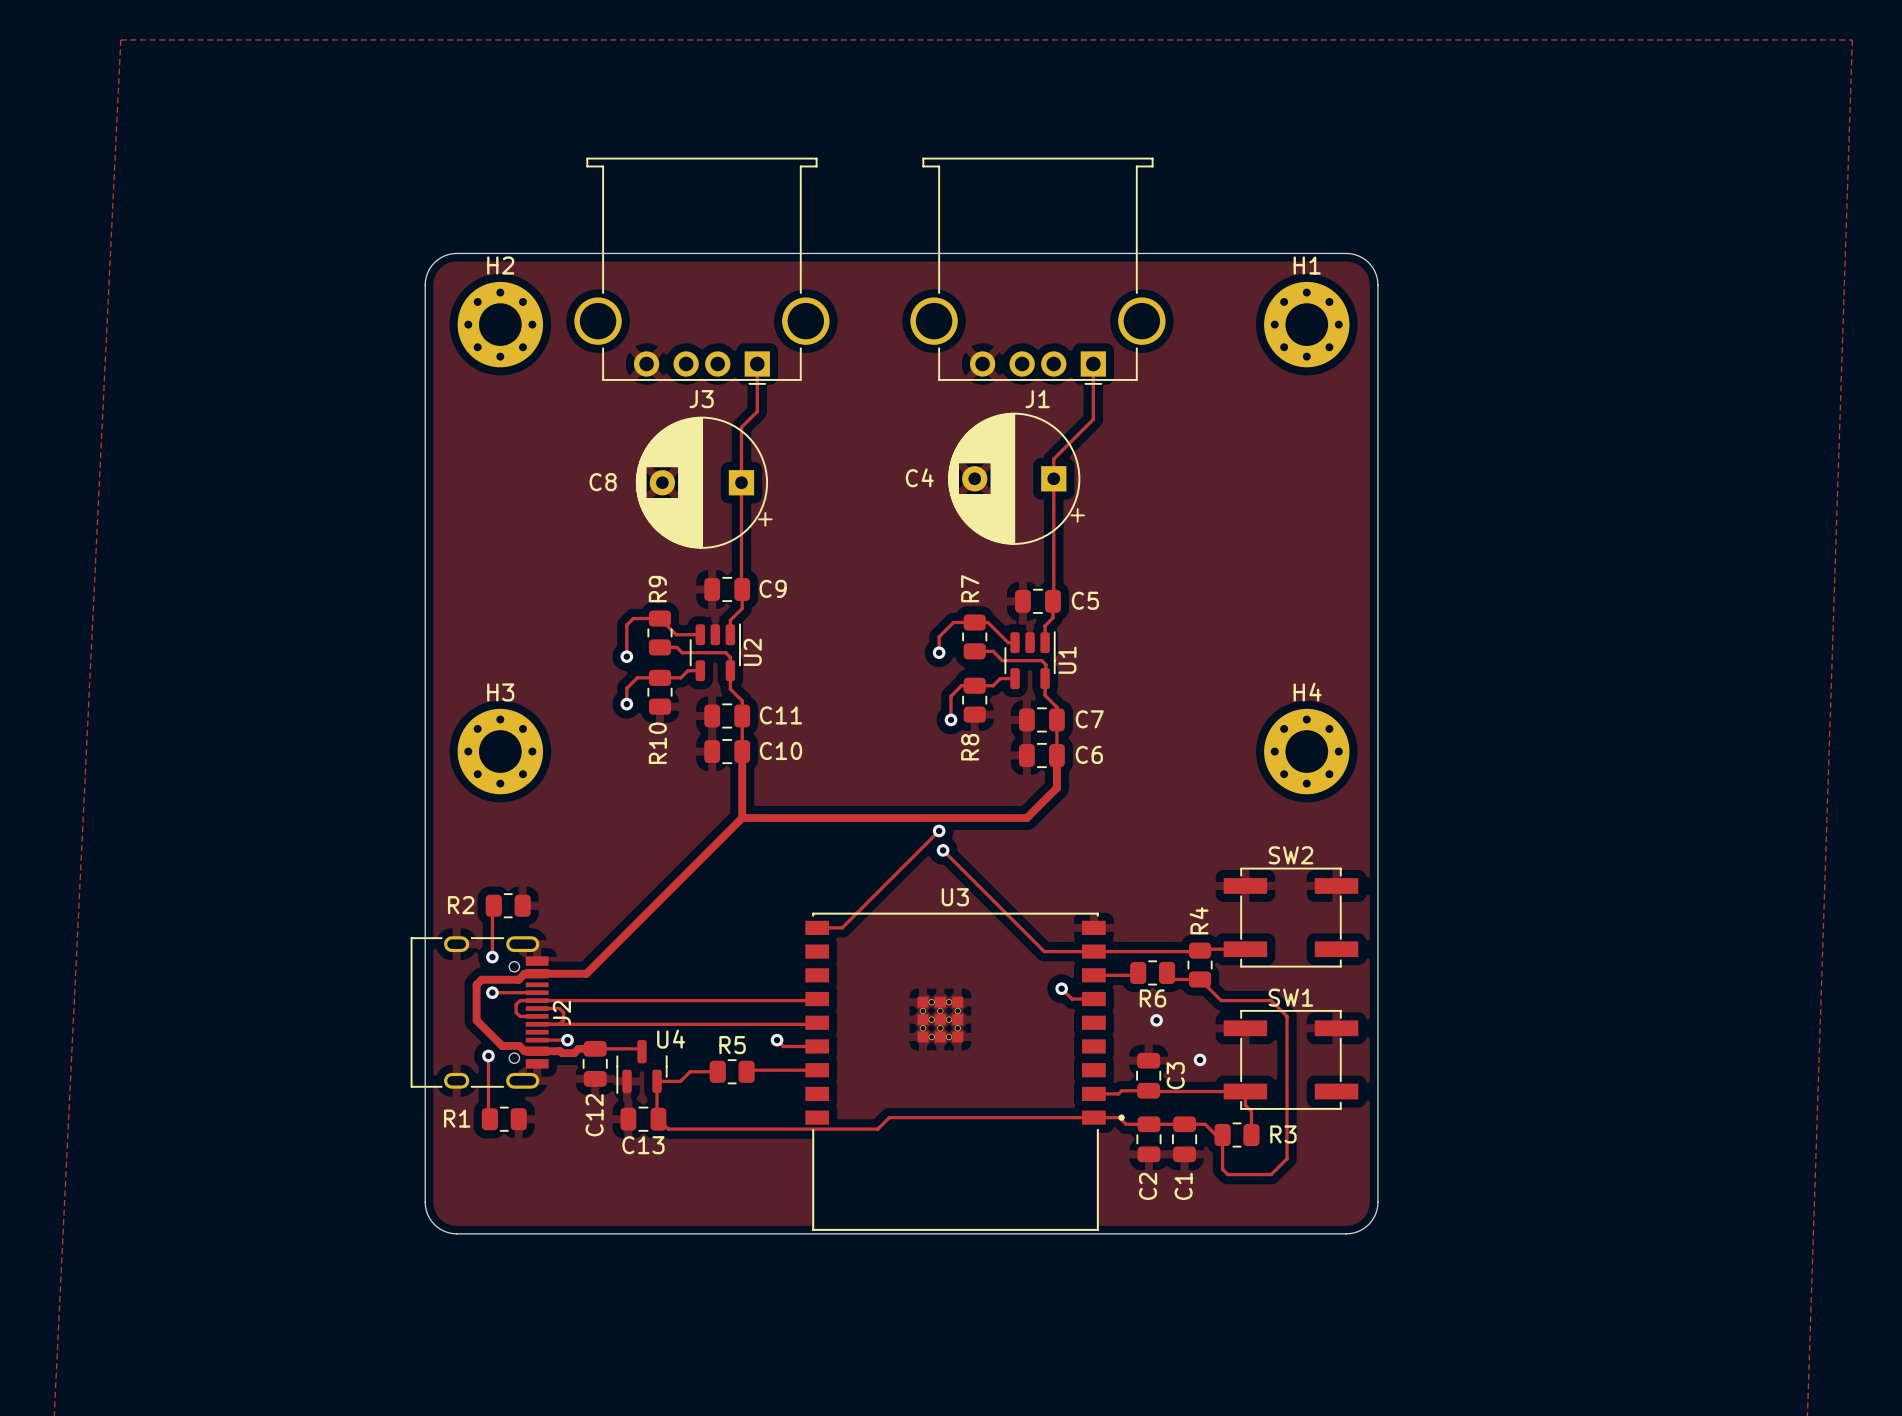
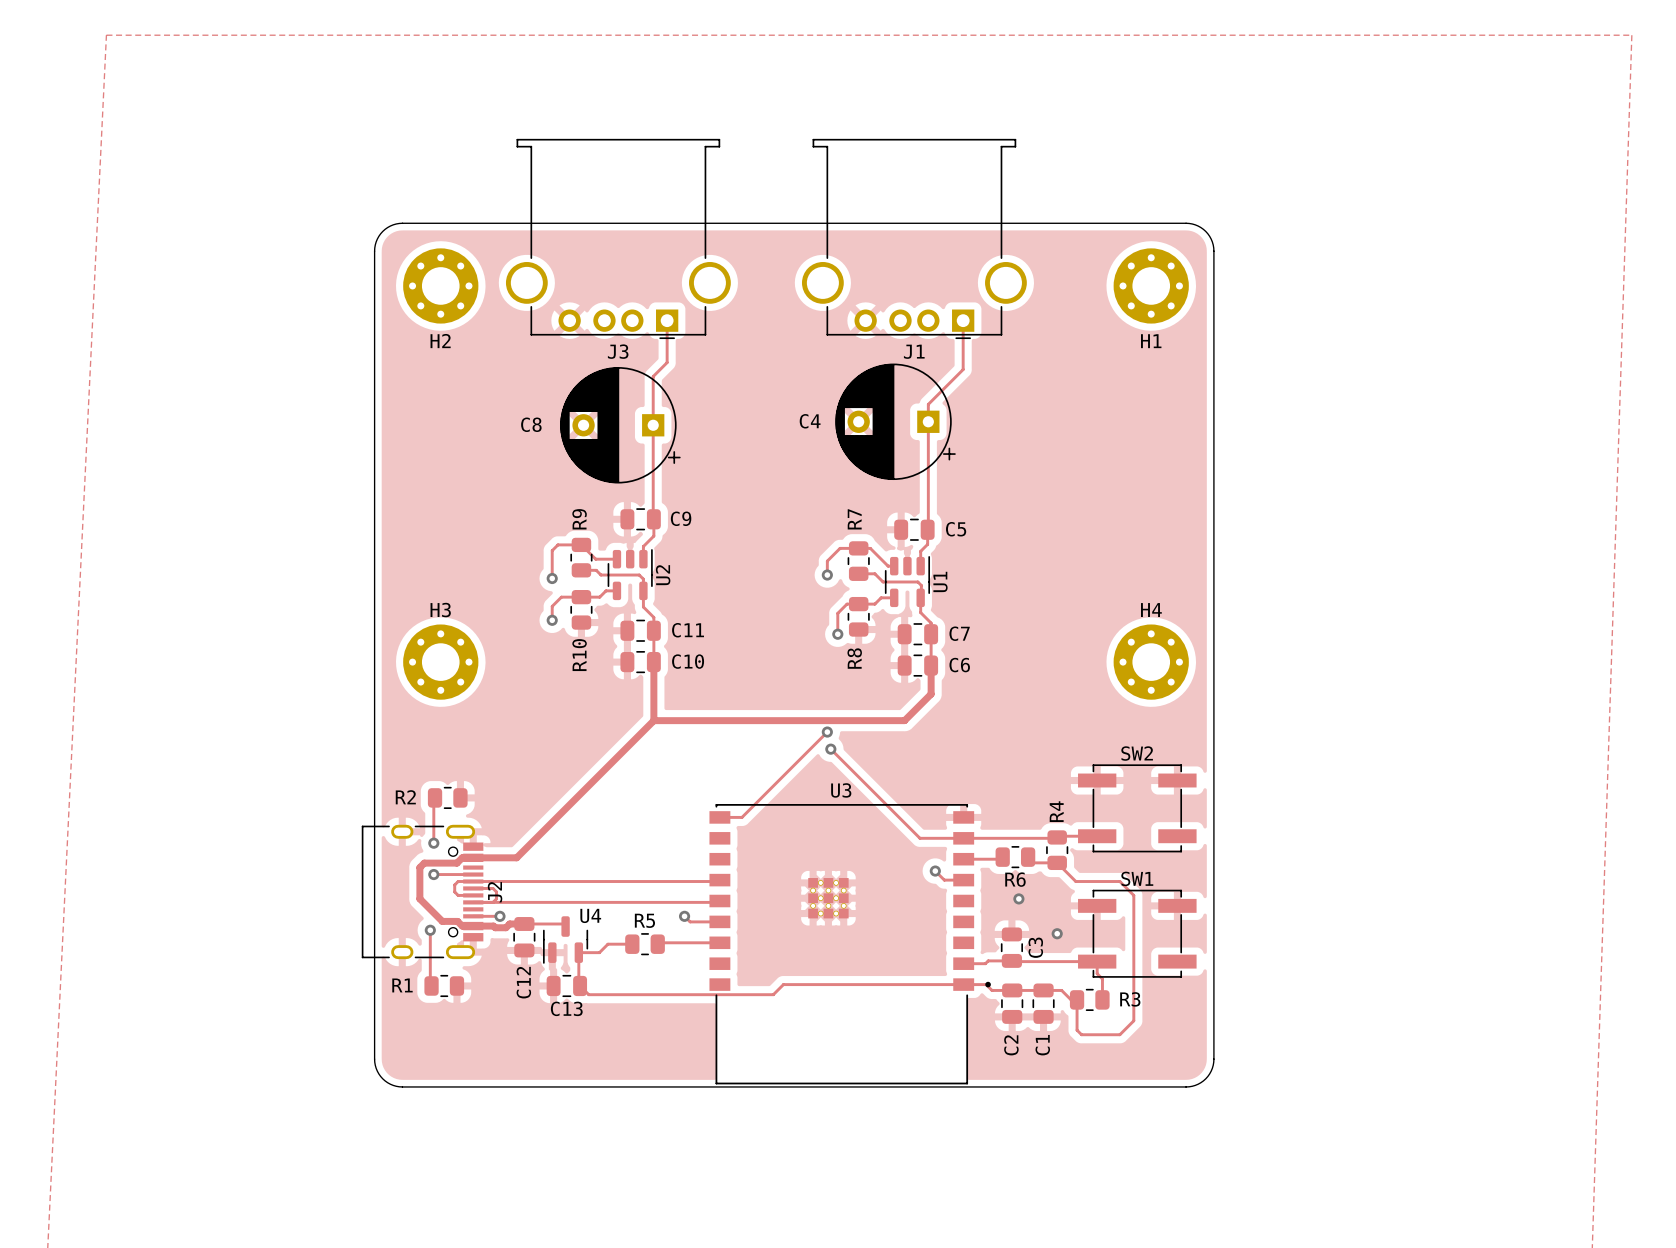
H2 name position: H2 (500, 265) -> H2 (440, 341)
H1 name position: H1 (1307, 265) -> H1 (1151, 341)

